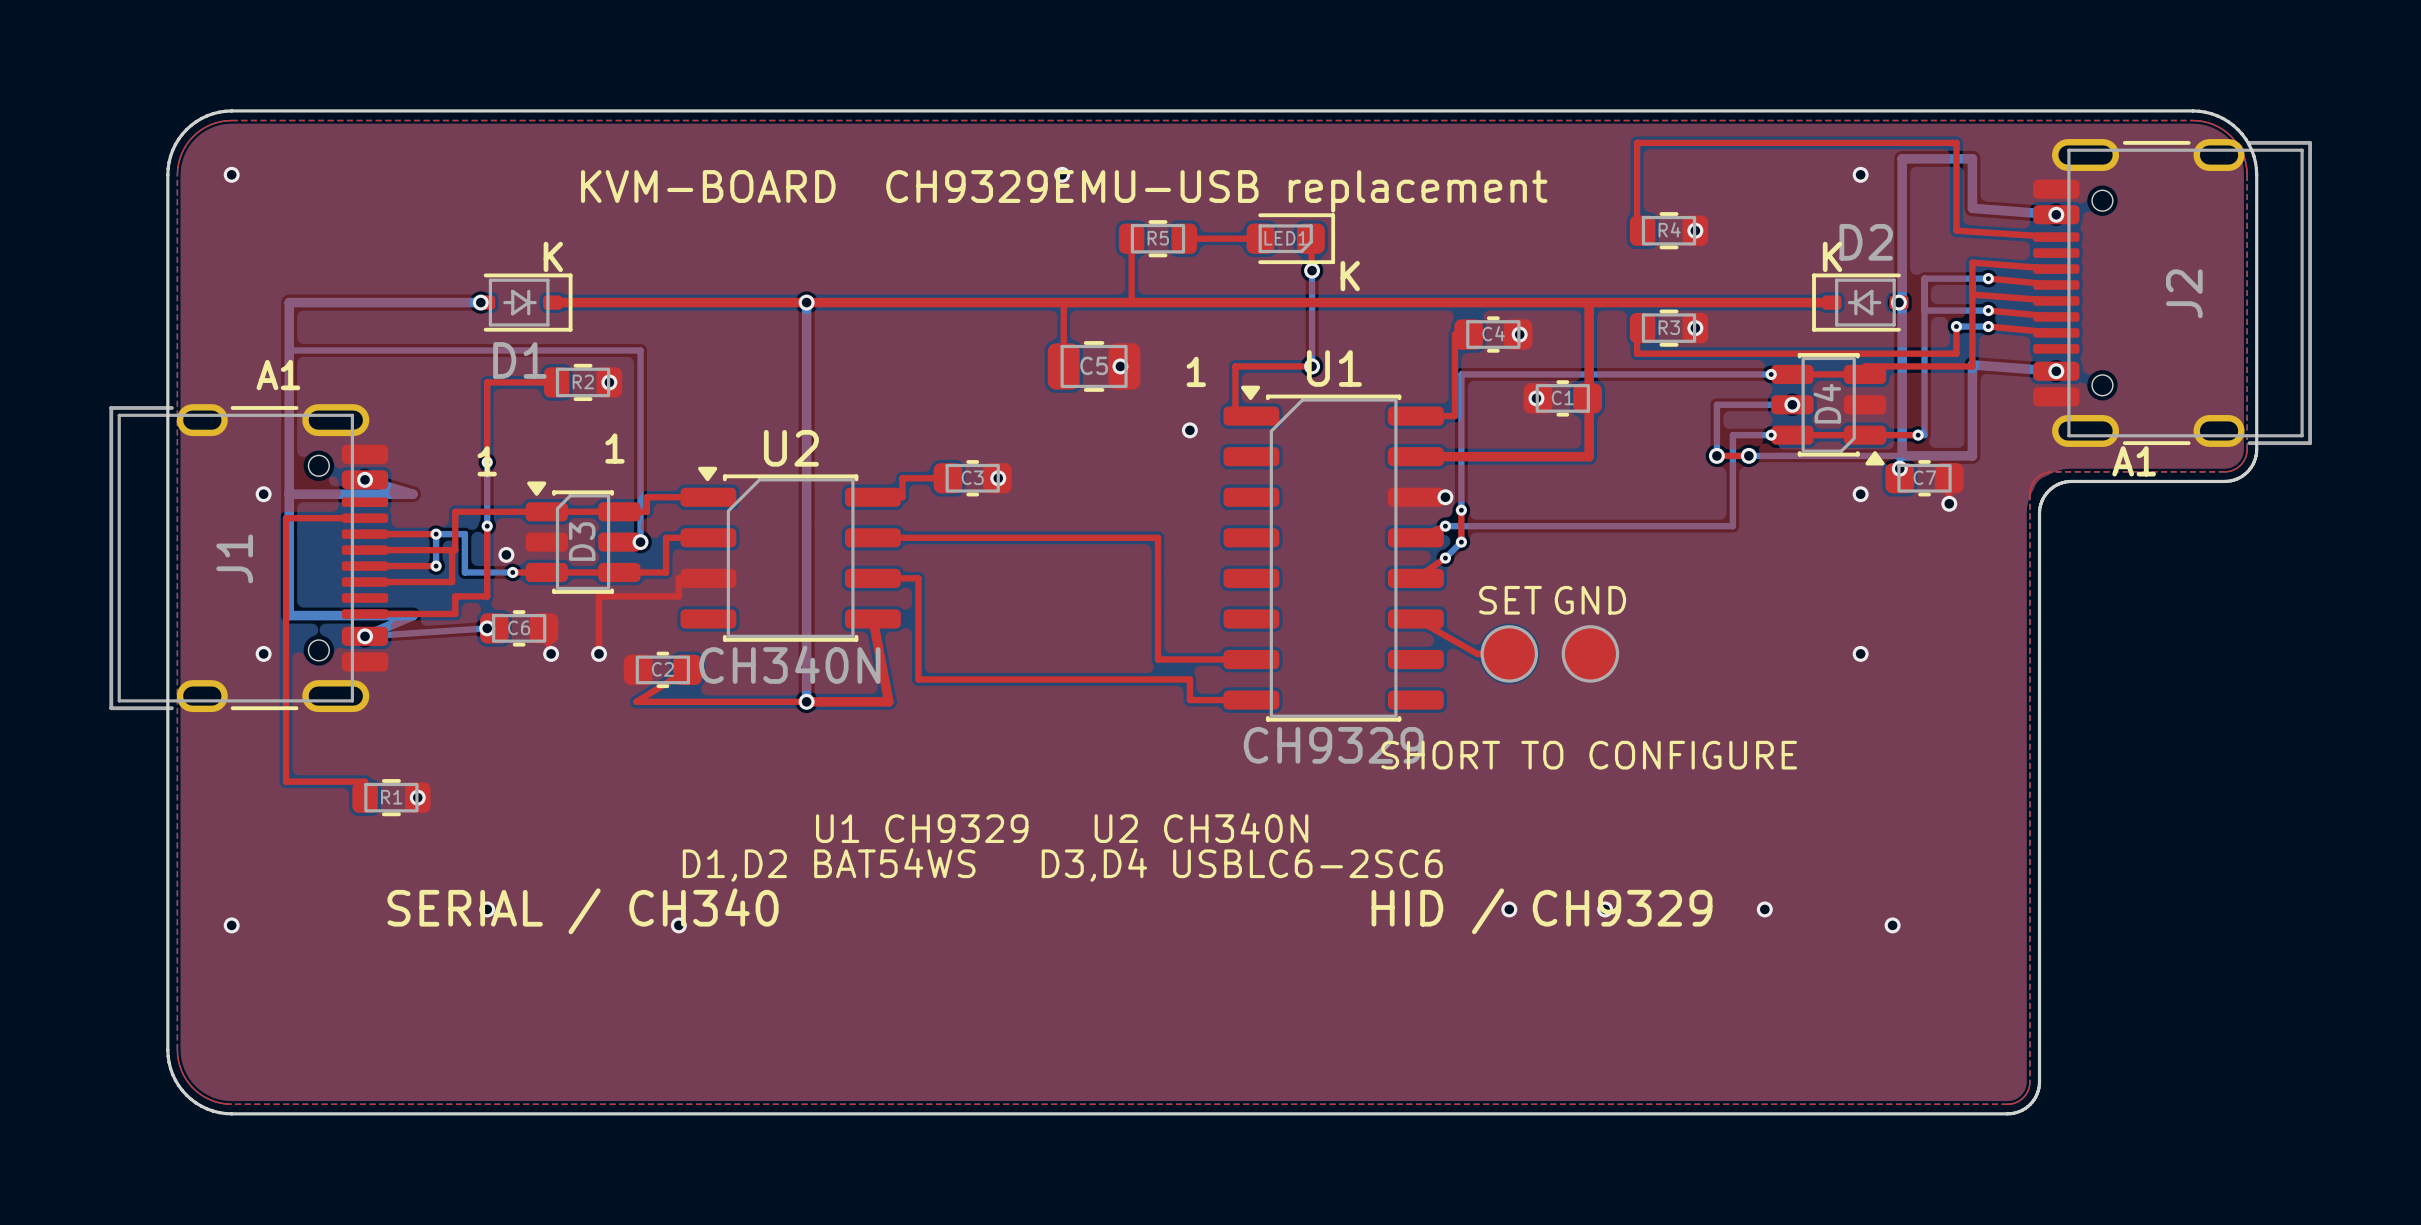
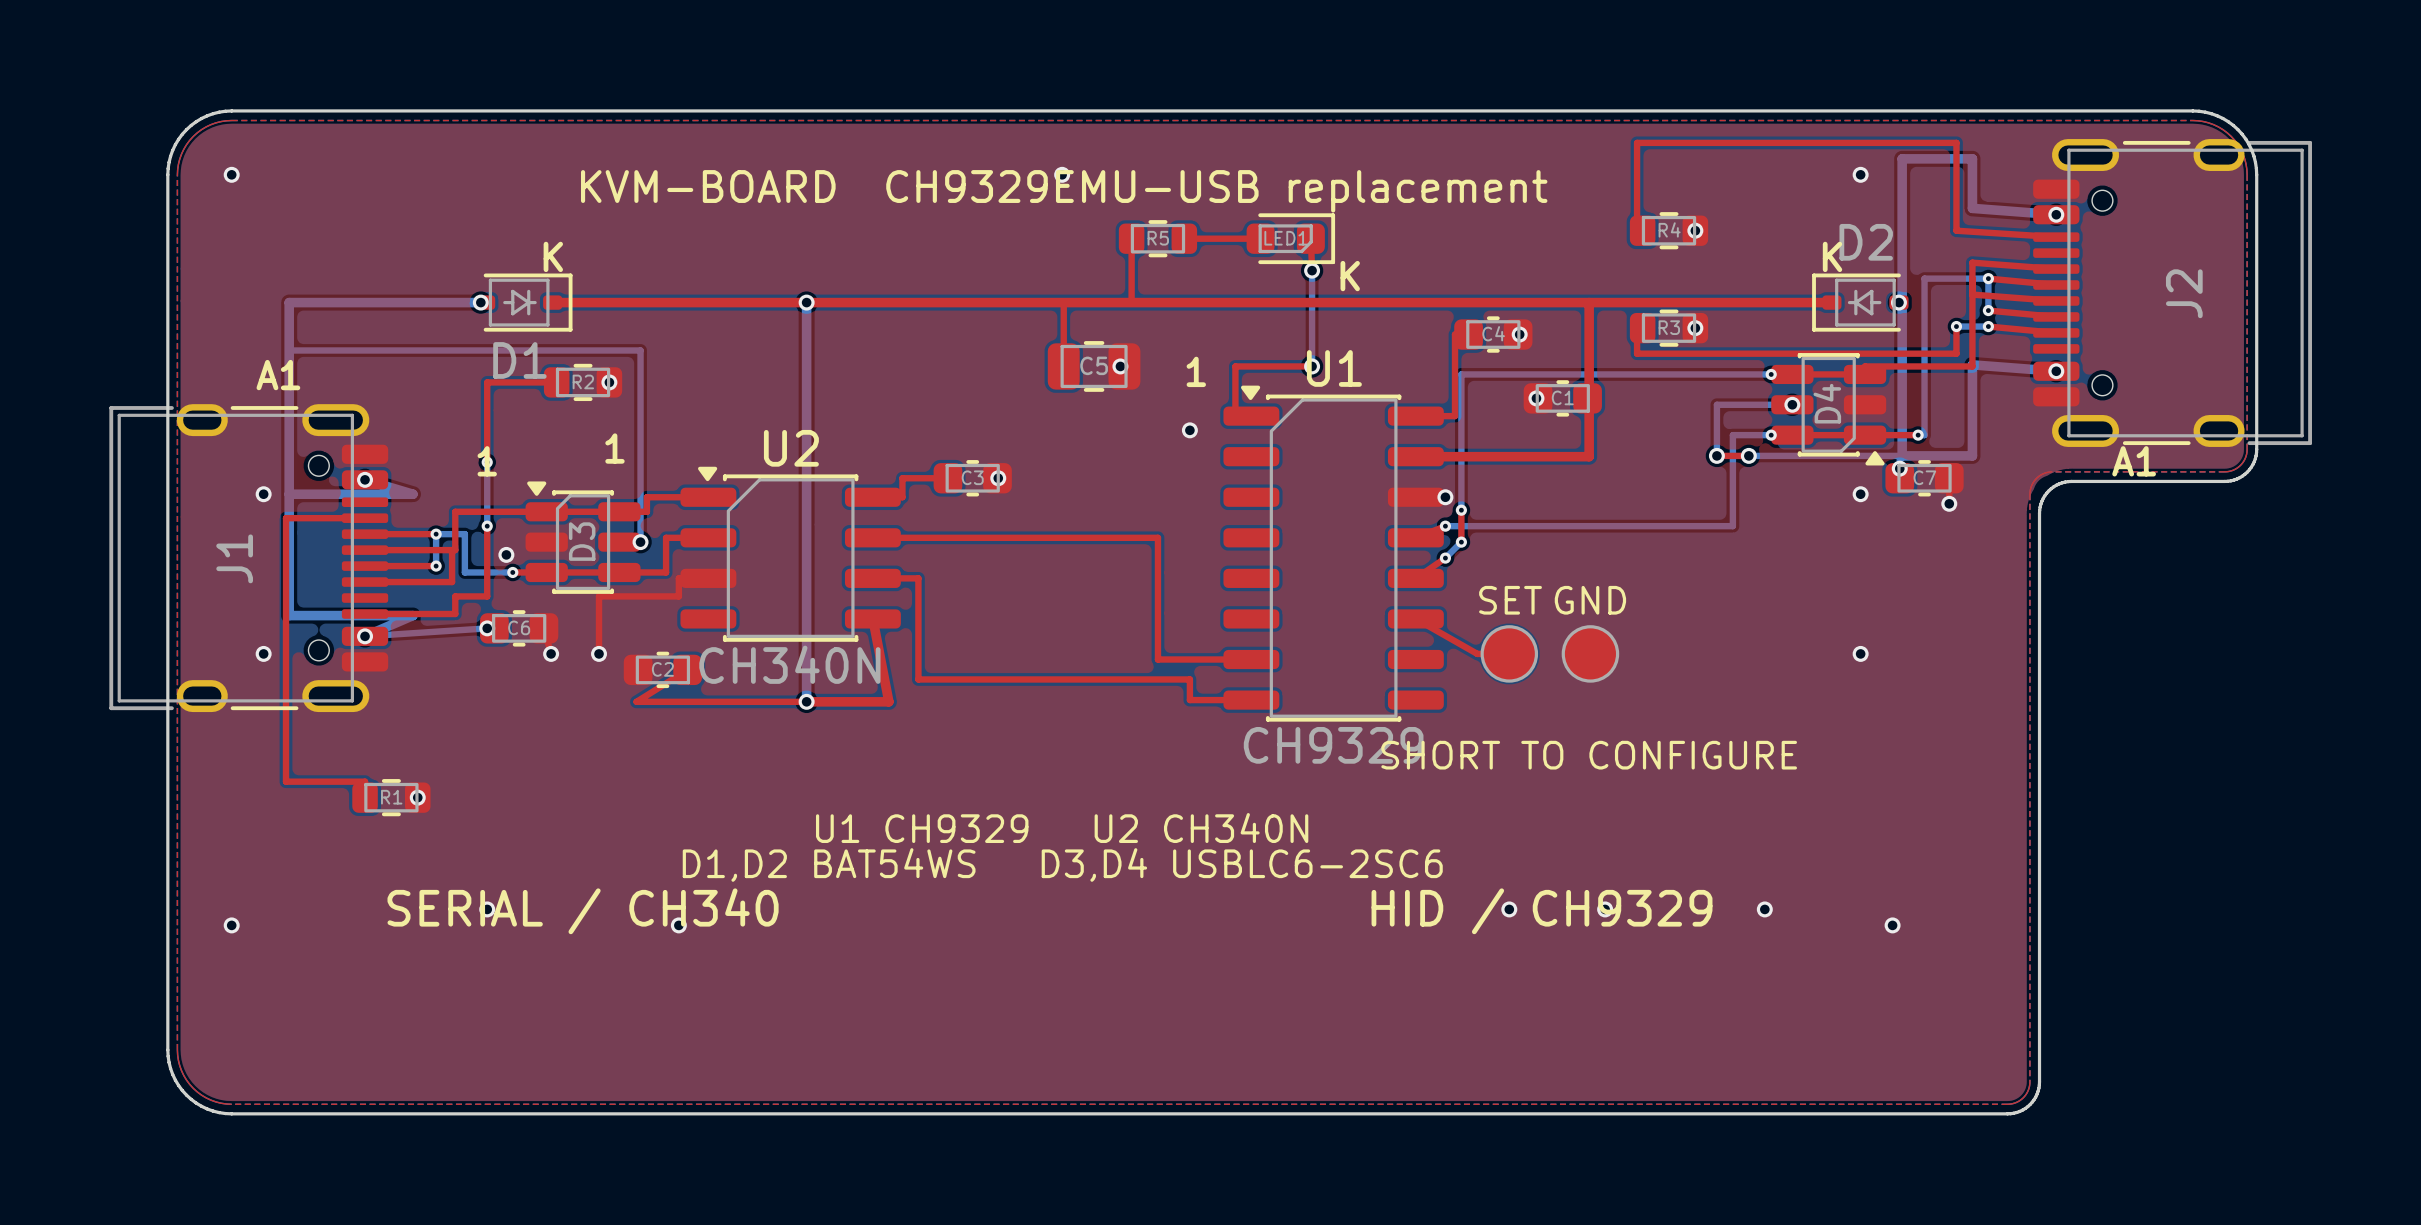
bottom track: (1924, 310) (1988, 310) -> (1988, 278) (1988, 310)

